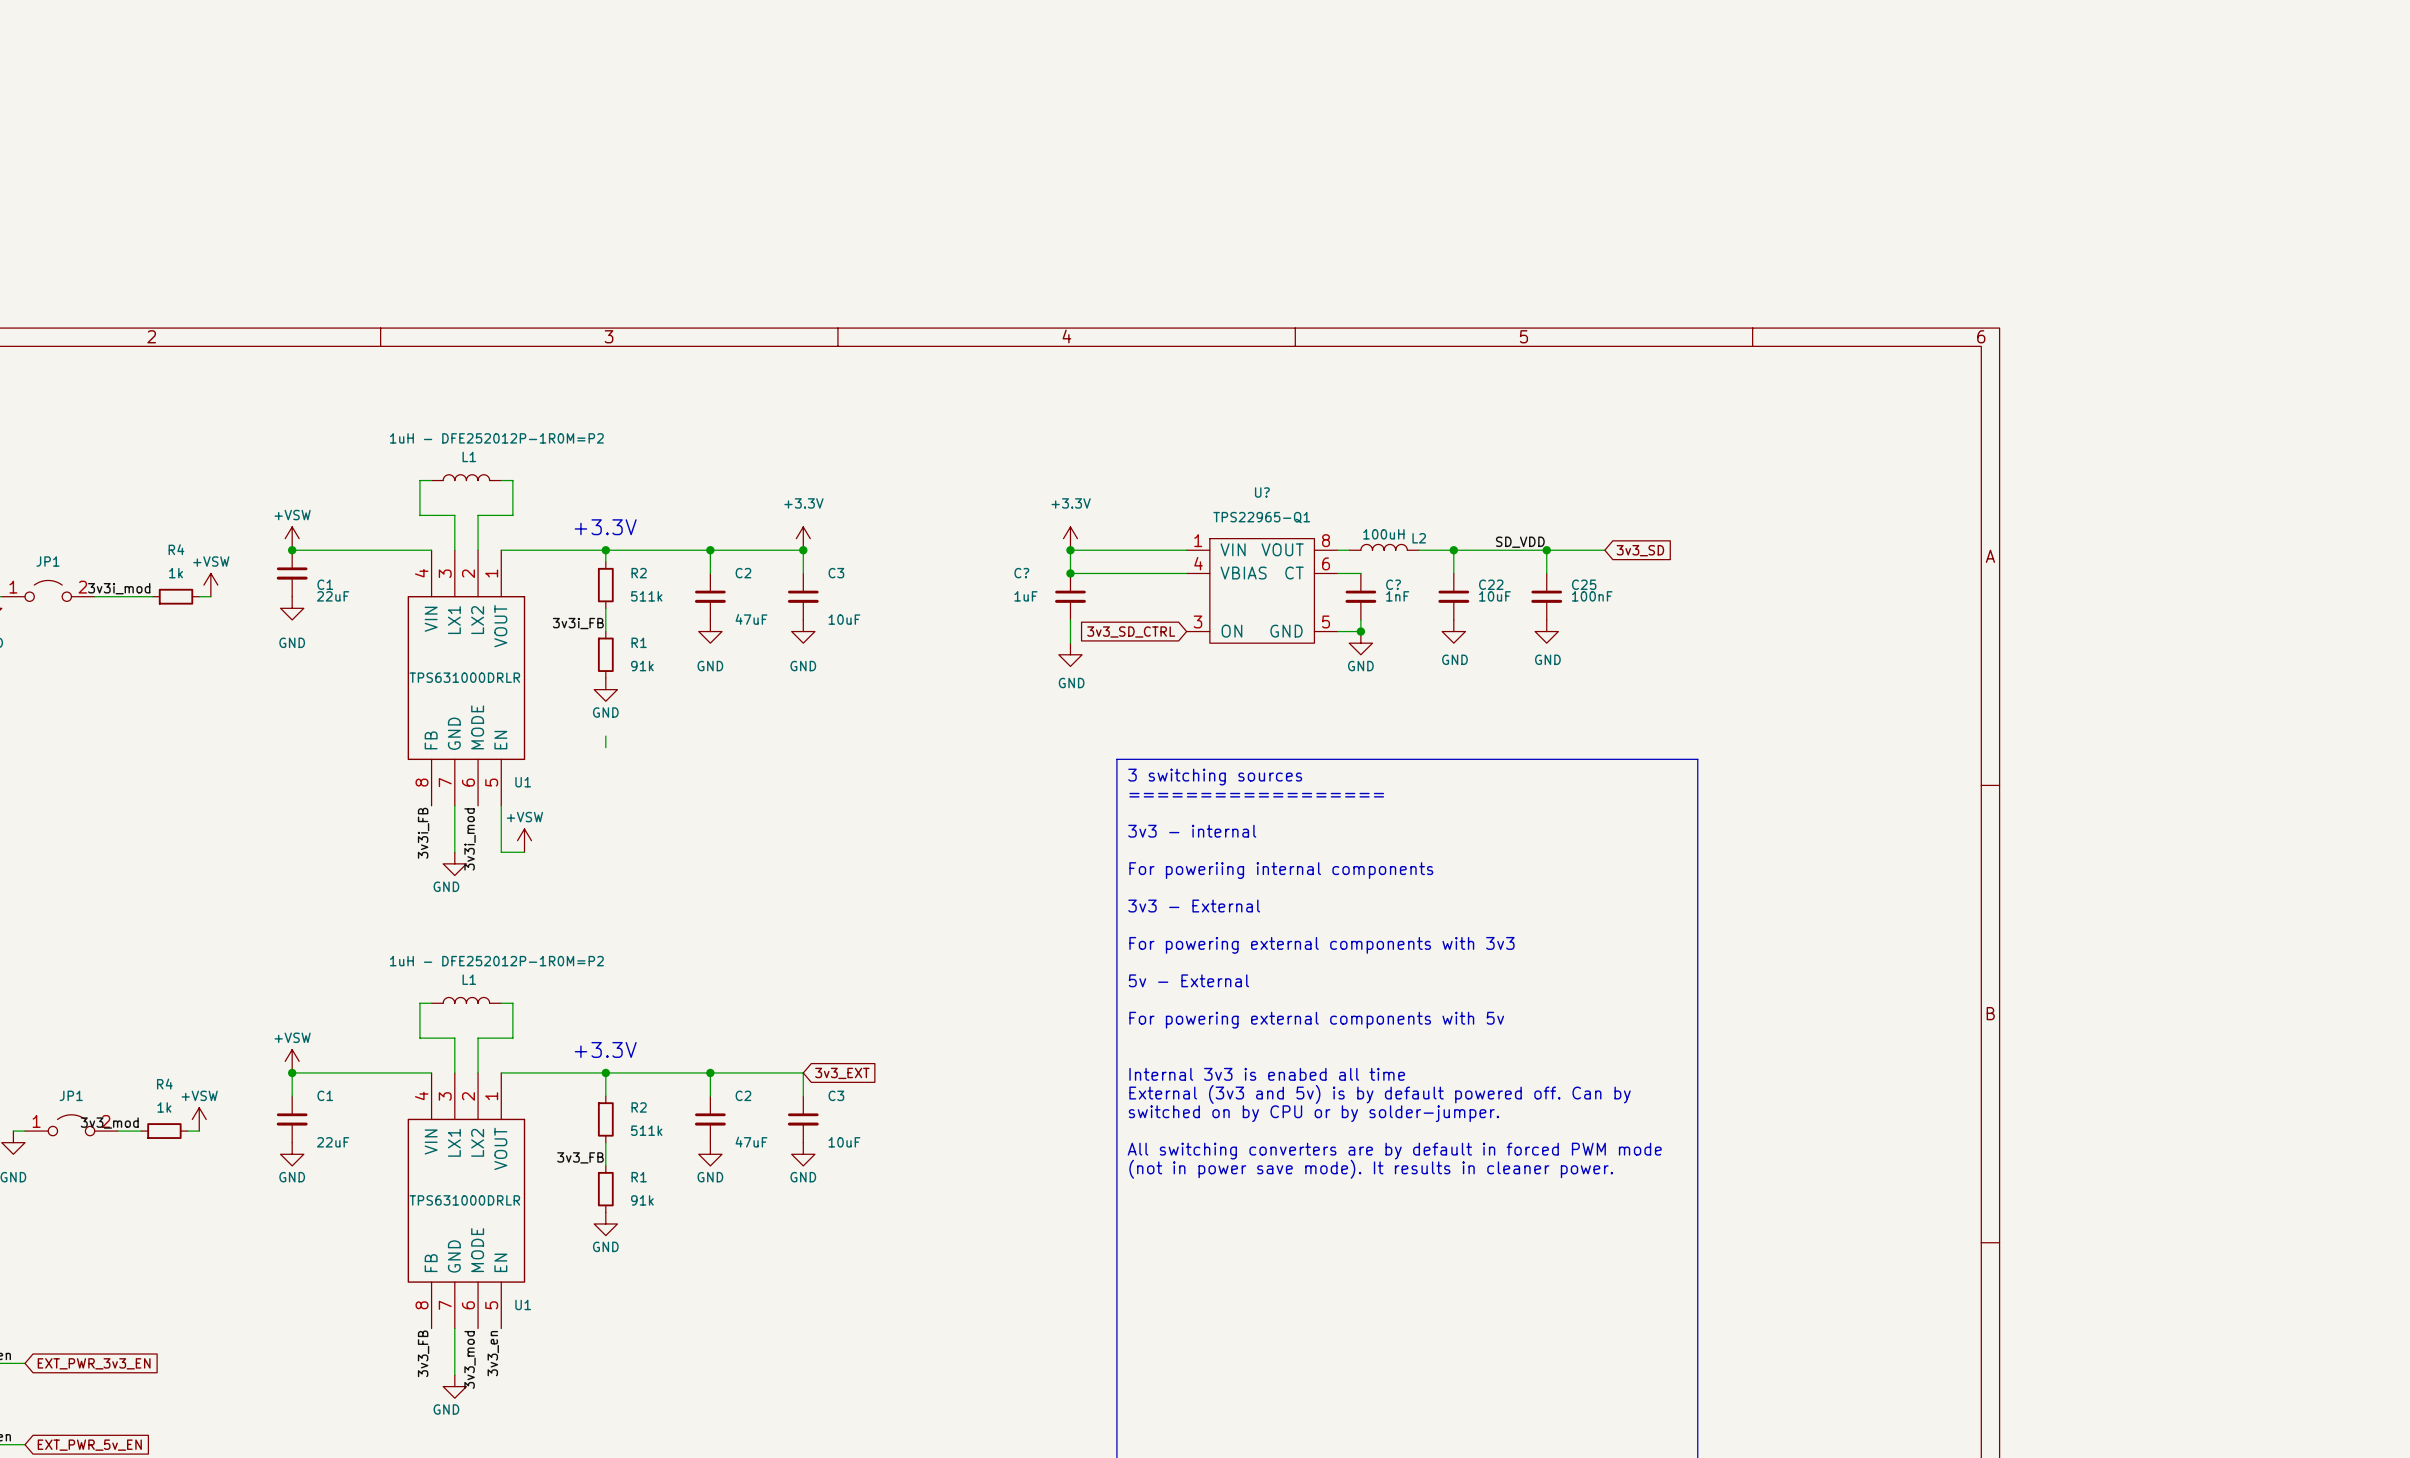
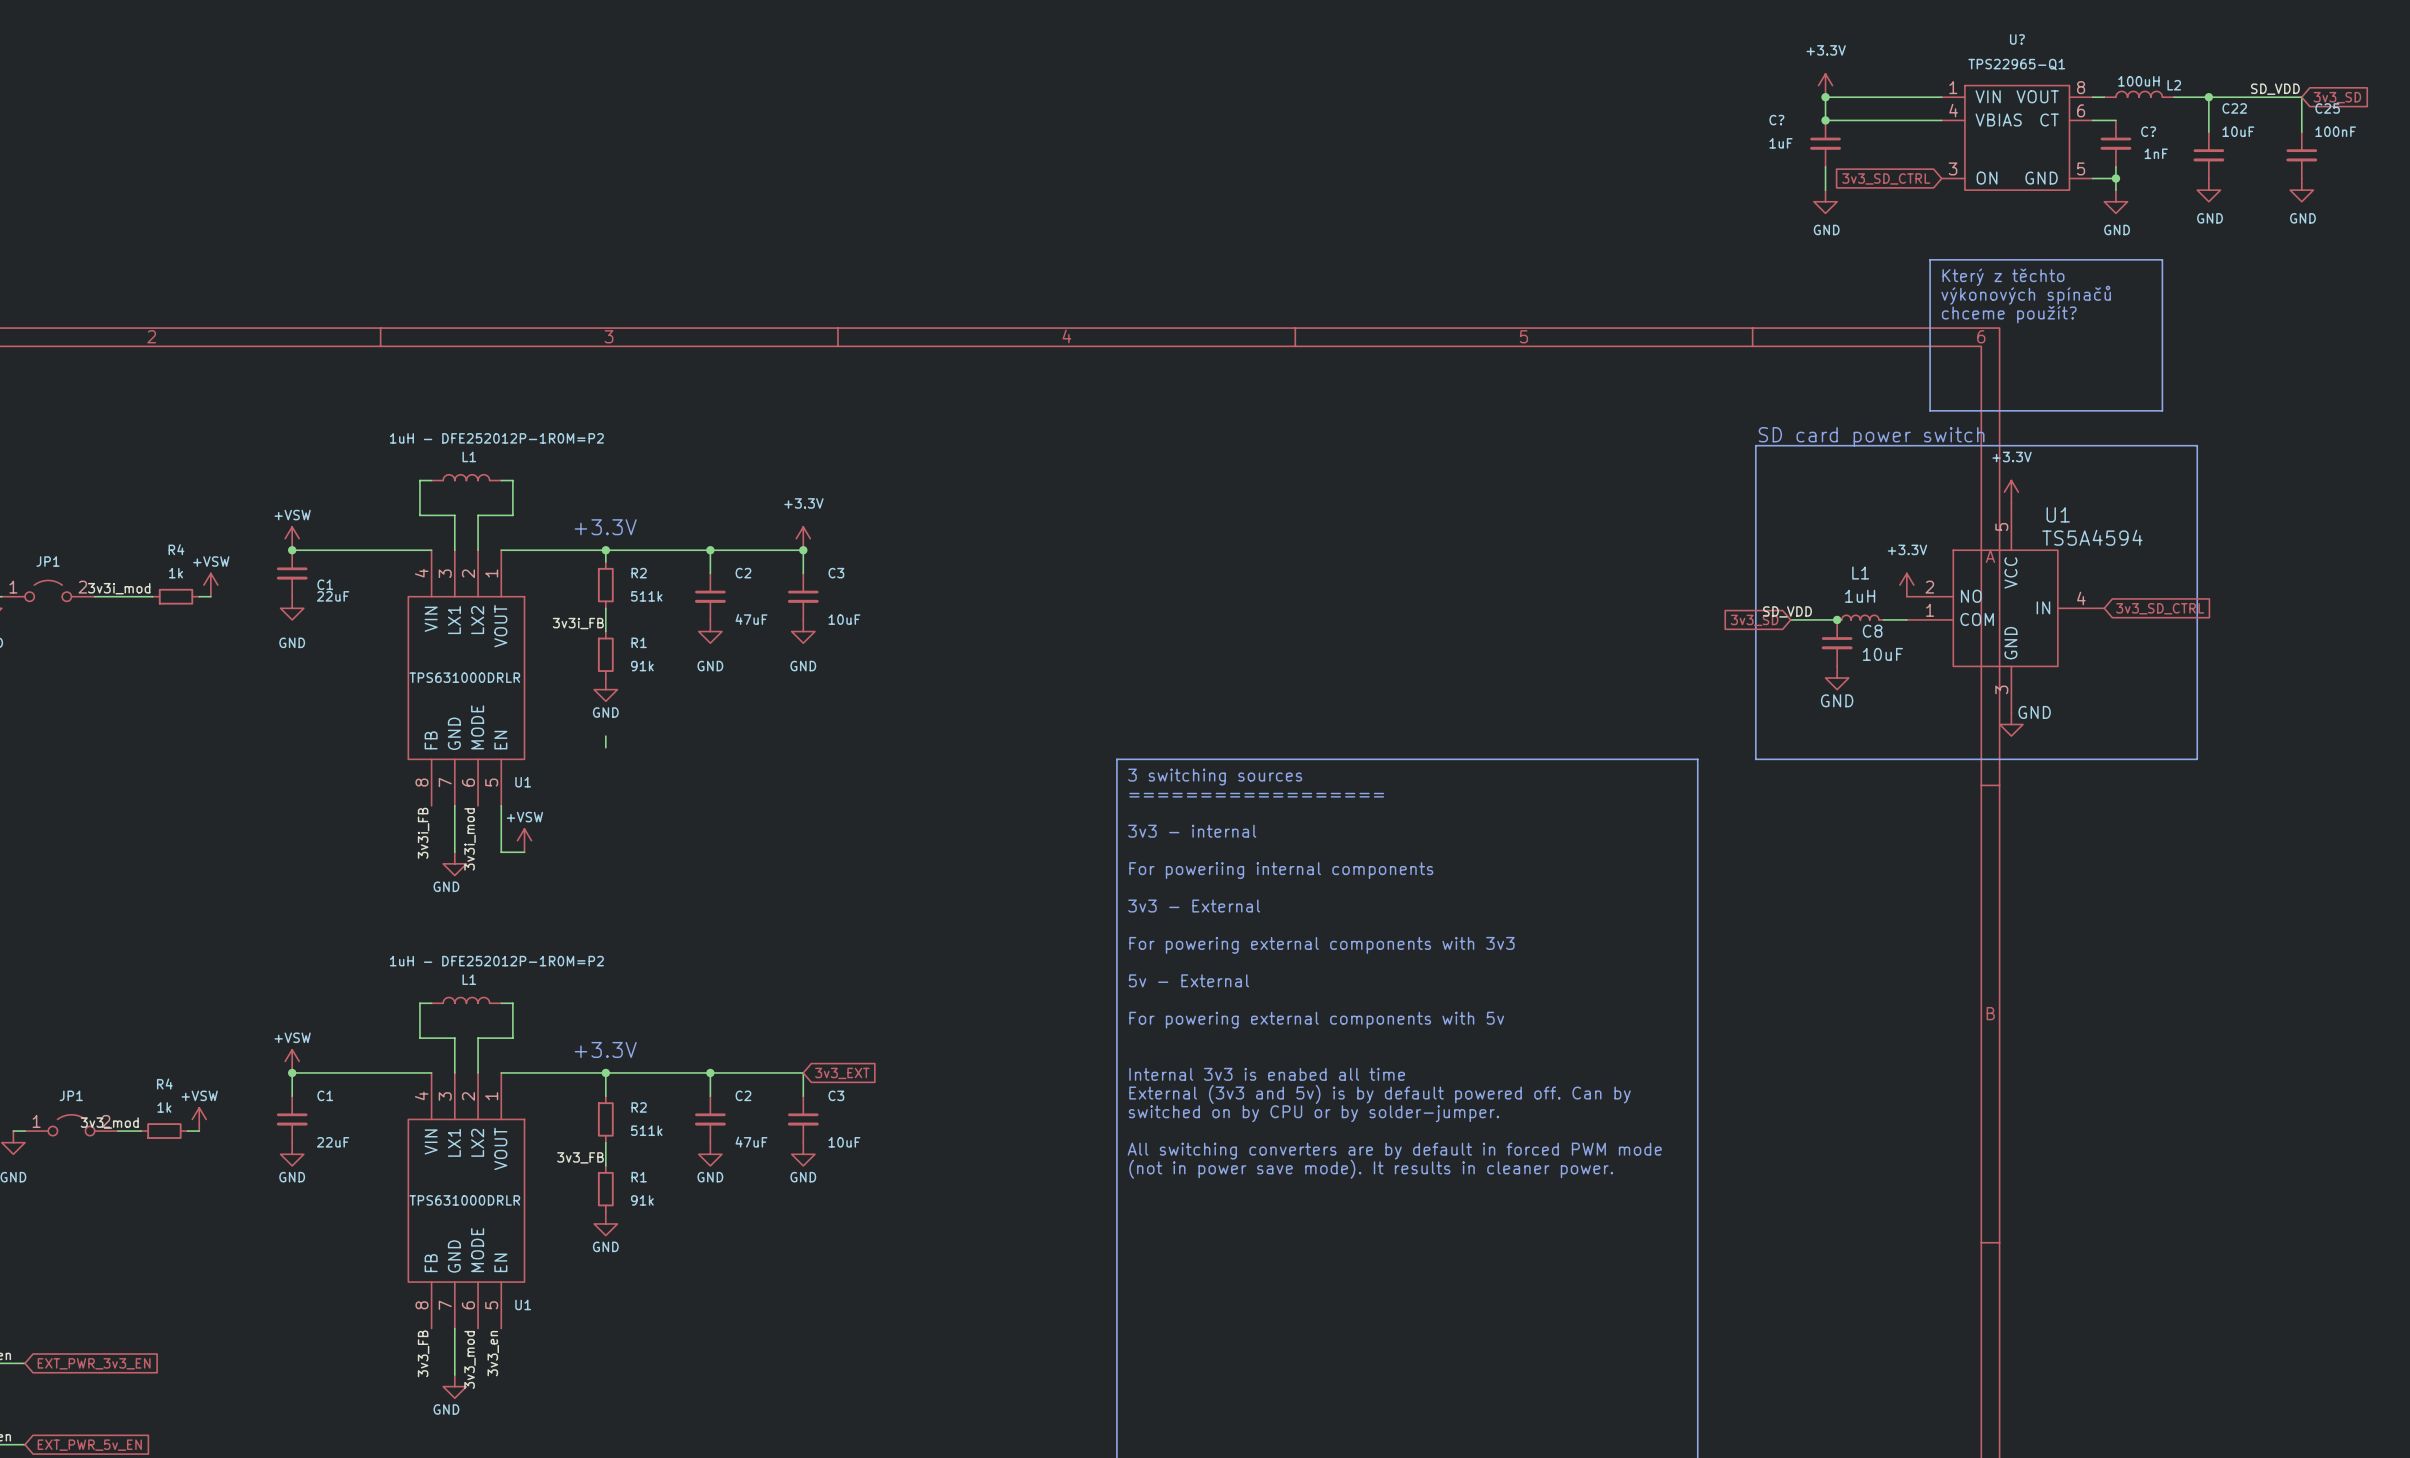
power symbol: none -> +3.3V (1825, 85)
label: none -> SD_VDD (2275, 89)
junction: none -> (1825, 97)
wire: none -> (1941, 97) (1825, 97) (1825, 120) (1941, 120)
wire: none -> (2092, 97) (2104, 97)
wire: none -> (2174, 97) (2301, 97) (2301, 132)
wire: none -> (2208, 97) (2208, 132)
junction: none -> (2208, 97)
global label: none -> 3v3_SD (2337, 97)
junction: none -> (1825, 120)
wire: none -> (2092, 120) (2115, 120)
U?: none -> TPS22965-Q1 (2017, 137)
C?: none -> 1uF (1825, 143)
C?: none -> 1nF (2115, 143)
wire: none -> (1825, 166) (1825, 190)
wire: none -> (2115, 166) (2115, 190)
global label: none -> 3v3_SD_CTRL (1886, 178)
wire: none -> (2092, 178) (2115, 178)
junction: none -> (2115, 178)
power symbol: none -> GND (2208, 190)
power symbol: none -> GND (2301, 190)
power symbol: none -> GND (1825, 201)
power symbol: none -> GND (2115, 201)
line: none -> (1930, 259) (2162, 259) (2162, 410) (1930, 410) (1930, 259)
text: none -> Který z těchto (2003, 277)
text: none -> výkonových spínačů (2026, 295)
text: none -> chceme použít? (2009, 314)
text: none -> SD card power switch (1871, 437)
line: none -> (1755, 445) (2197, 445) (2197, 759) (1755, 759) (1755, 445)
power symbol: none -> +3.3V (2011, 492)
power symbol: +3.3V (1070, 538) -> none
label: SD_VDD (1520, 542) -> none
L2 position: (1384, 547) -> (2139, 94)
junction: (1070, 550) -> none
wire: (1186, 550) (1070, 550) (1070, 573) (1186, 573) -> none
wire: (1337, 550) (1349, 550) -> none
wire: (1418, 550) (1604, 550) -> none
wire: (1453, 550) (1453, 573) -> none
junction: (1453, 550) -> none
wire: (1546, 550) (1546, 573) -> none
junction: (1546, 550) -> none
global label rotation: 0° (1640, 550) -> 180° (1754, 620)
global label position: 3v3_SD (1640, 550) -> 3v3_SD (1754, 620)
junction: (1070, 573) -> none
wire: (1337, 573) (1360, 573) -> none
C22 name position: C22 (1491, 584) -> C22 (2234, 108)
C25 name position: C25 (1584, 584) -> C25 (2327, 108)
power symbol: none -> +3.3V (1906, 585)
U?: TPS22965-Q1 (1262, 590) -> none
C?: 1uF (1070, 596) -> none
C?: 1nF (1360, 596) -> none
C22 position: (1453, 596) -> (2208, 155)
C22 value position: 10uF (1494, 596) -> 10uF (2238, 131)
C25 position: (1546, 596) -> (2301, 155)
C25 value position: 100nF (1592, 596) -> 100nF (2335, 131)
U1: none -> TS5A4594 (2005, 608)
global label: none -> 3v3_SD_CTRL (2160, 608)
label: none -> SD_VDD (1787, 611)
L1: none -> 1uH (1860, 617)
wire: (1070, 619) (1070, 643) -> none
wire: (1360, 619) (1360, 631) (1337, 631) -> none
wire: none -> (1790, 619) (1837, 619)
junction: none -> (1837, 619)
wire: none -> (1883, 619) (1906, 619)
global label: 3v3_SD_CTRL (1131, 631) -> none
junction: (1360, 631) -> none
power symbol: GND (1453, 631) -> none
power symbol: GND (1546, 631) -> none
power symbol: GND (1360, 643) -> none
C8: none -> 10uF (1837, 643)
power symbol: GND (1070, 654) -> none
power symbol: none -> GND (1837, 678)
power symbol: none -> GND (2011, 724)

